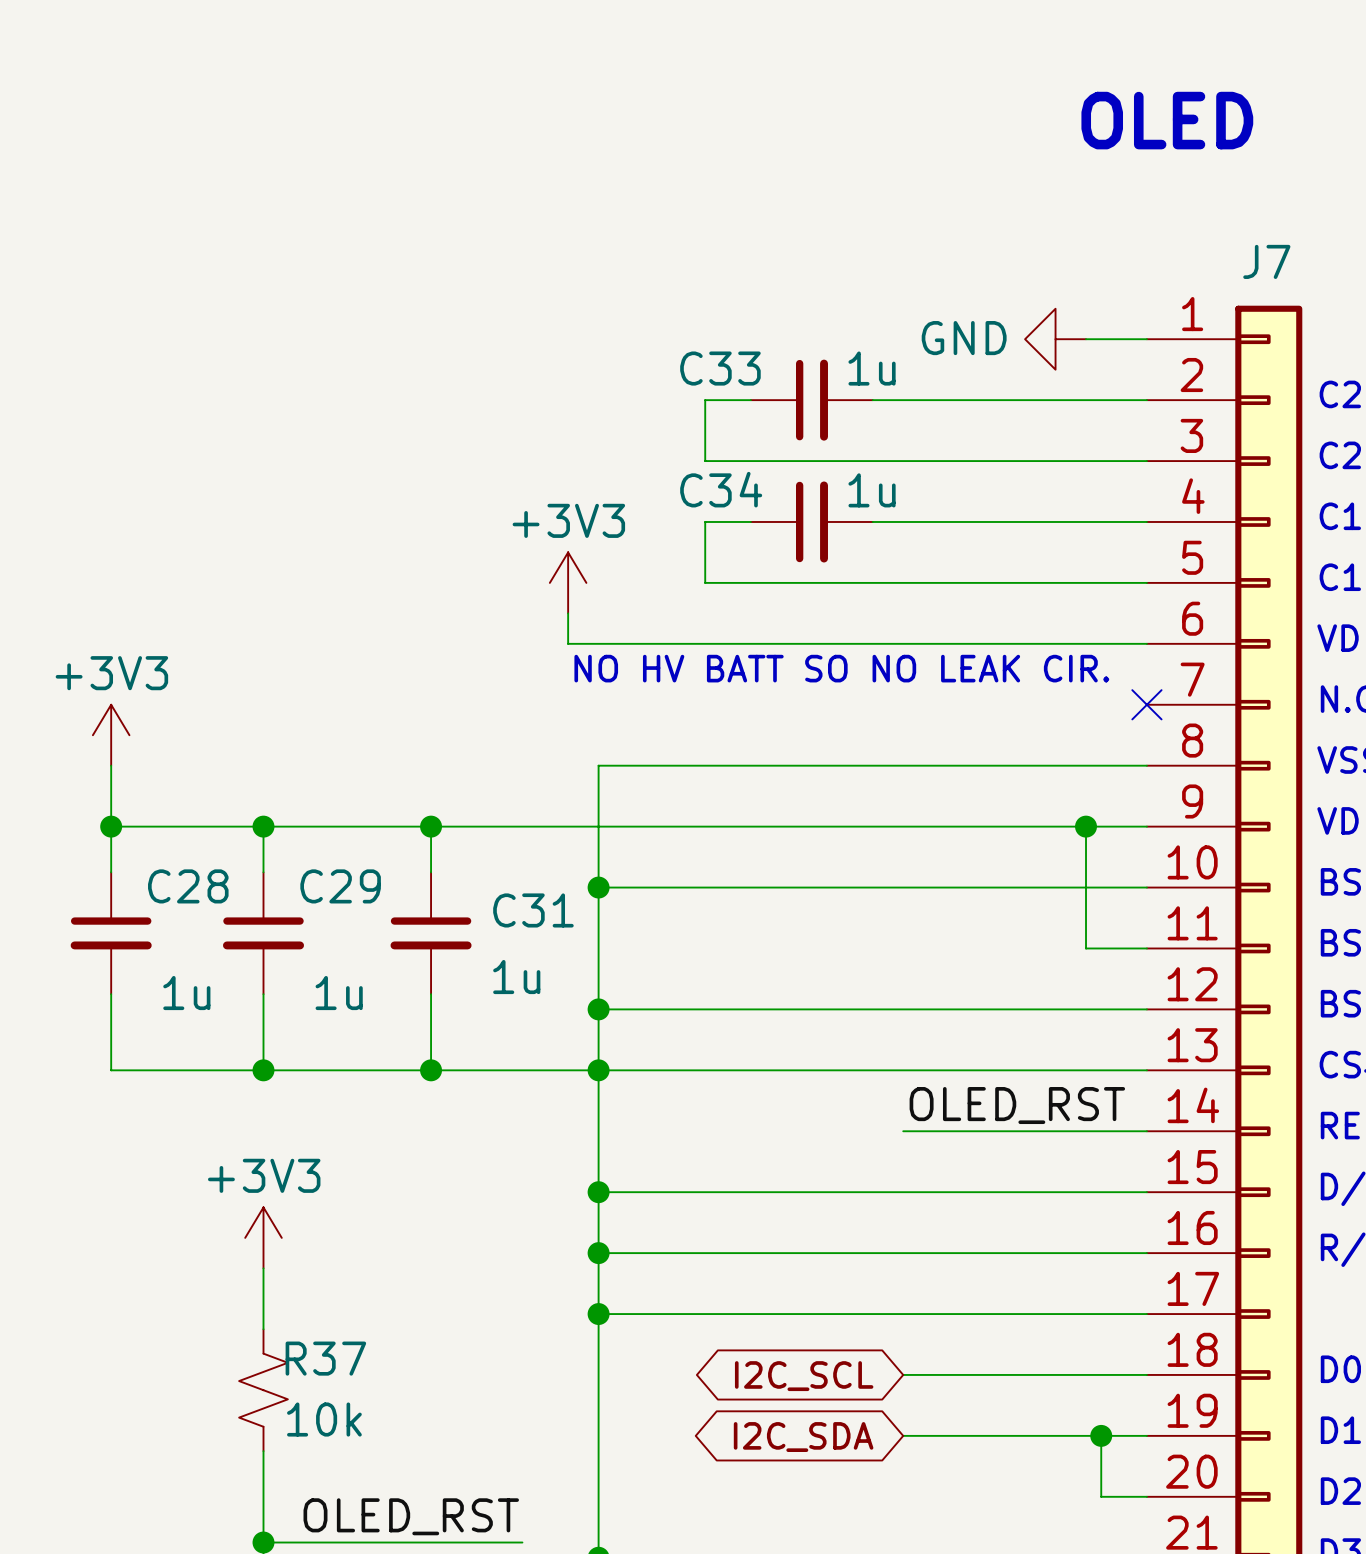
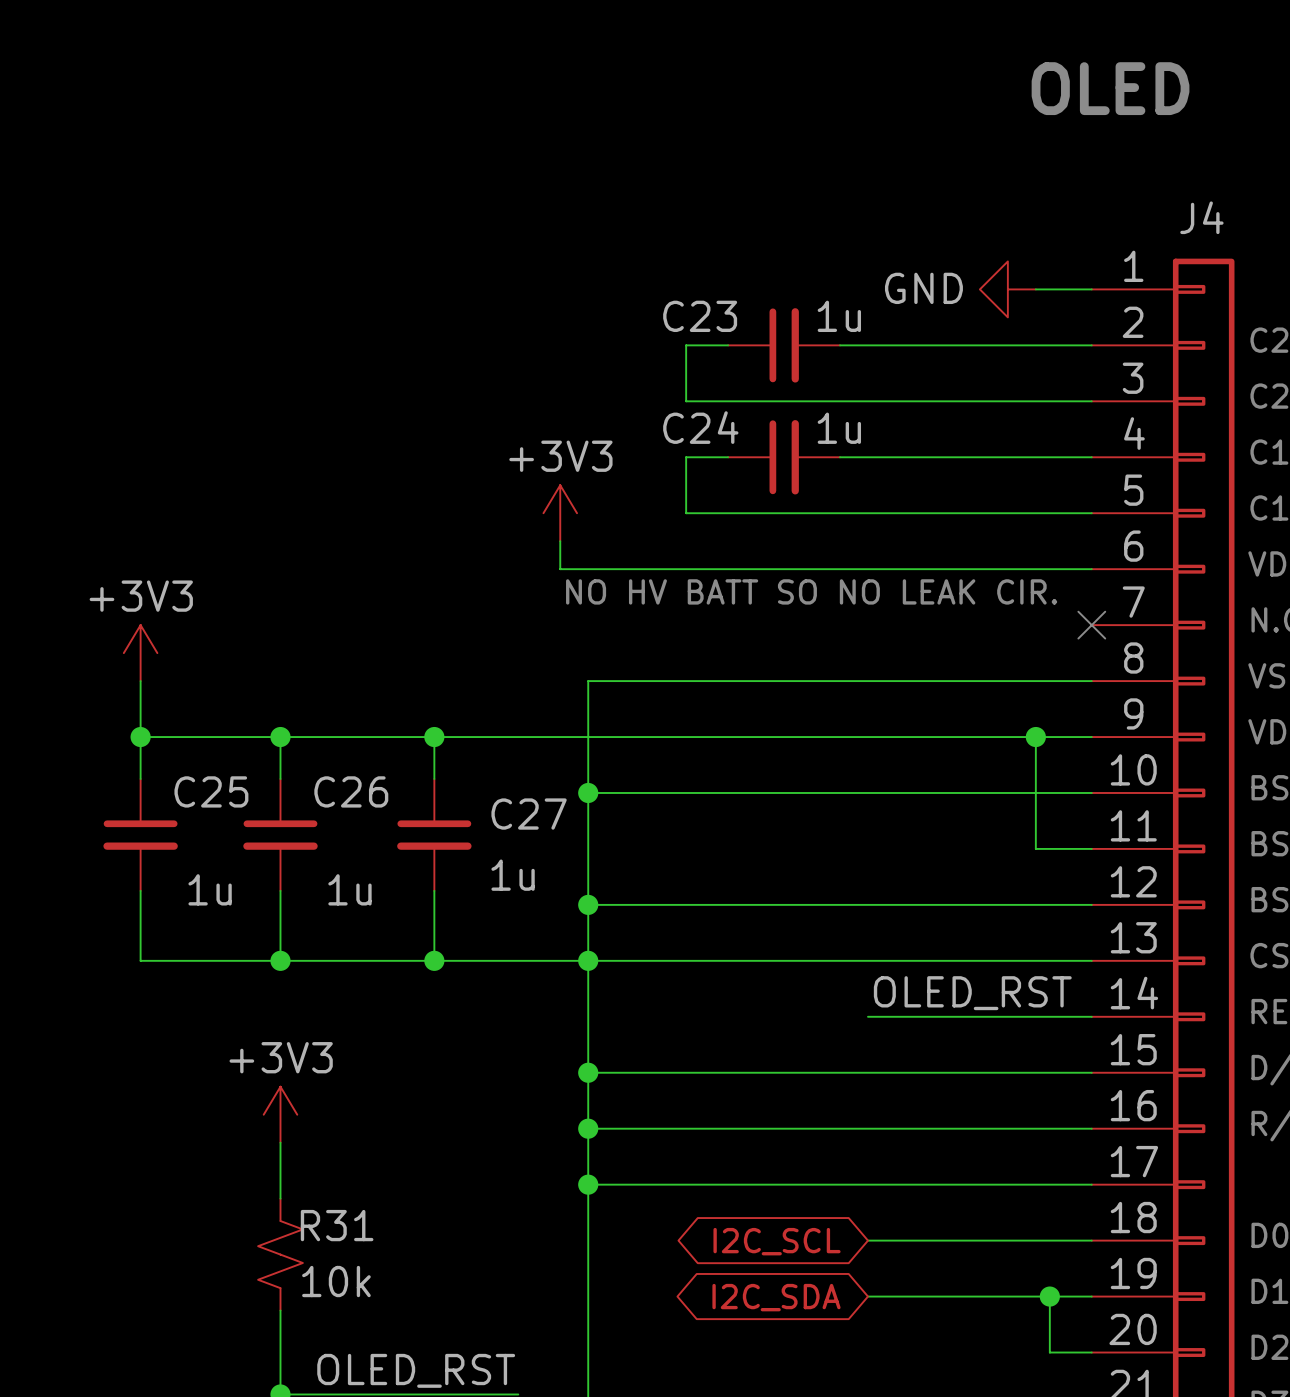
J7 name: J7 (1266, 261) -> J4 (1201, 217)
C33 name: C33 (720, 368) -> C23 (700, 316)
C34 name: C34 (721, 489) -> C24 (700, 427)
C28 name: C28 (188, 886) -> C25 (211, 791)
C29 name: C29 (340, 886) -> C26 (351, 791)
C31 name: C31 (533, 910) -> C27 (529, 814)
R37 name: R37 (325, 1358) -> R31 (337, 1225)

